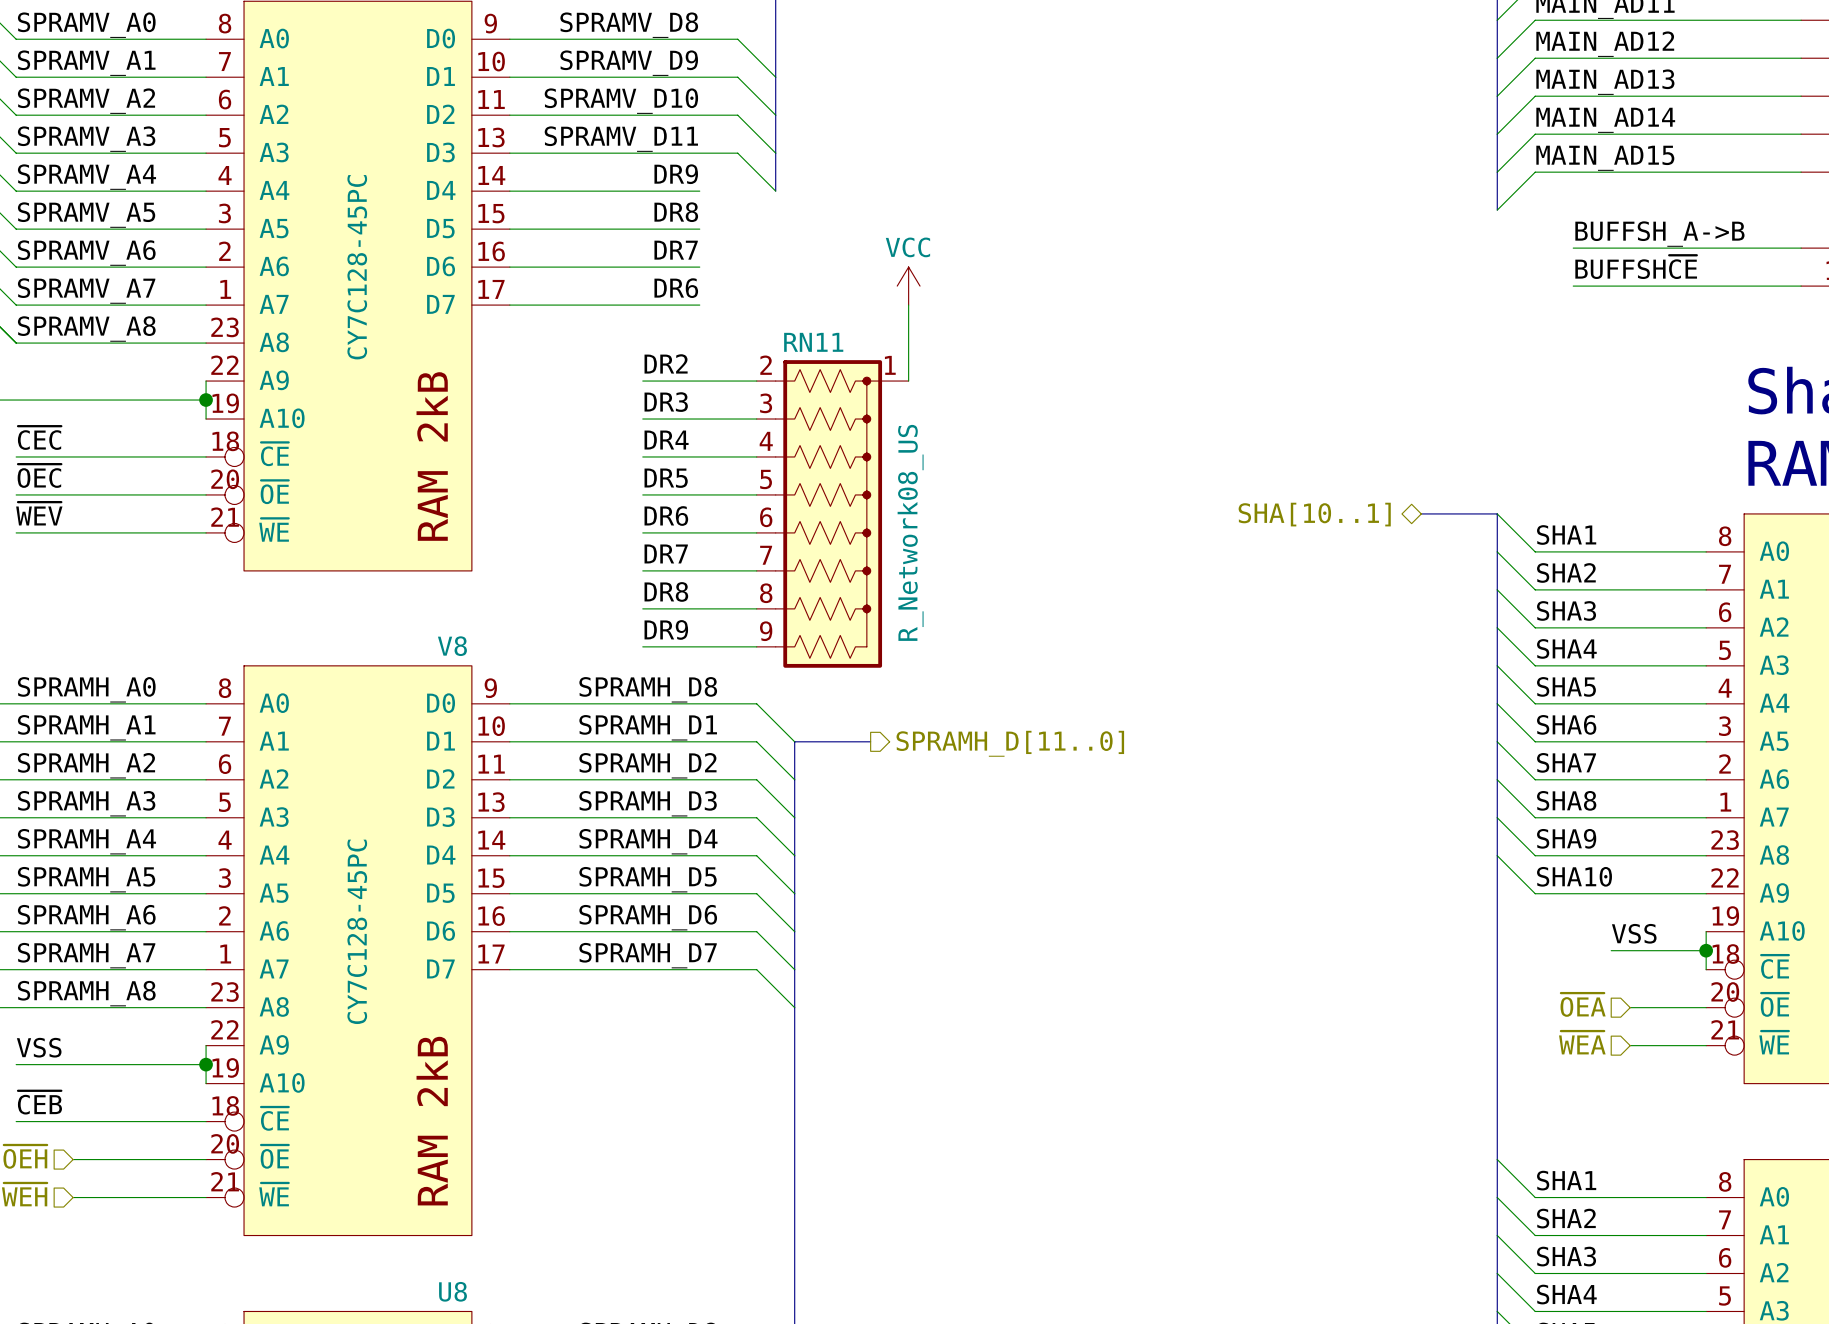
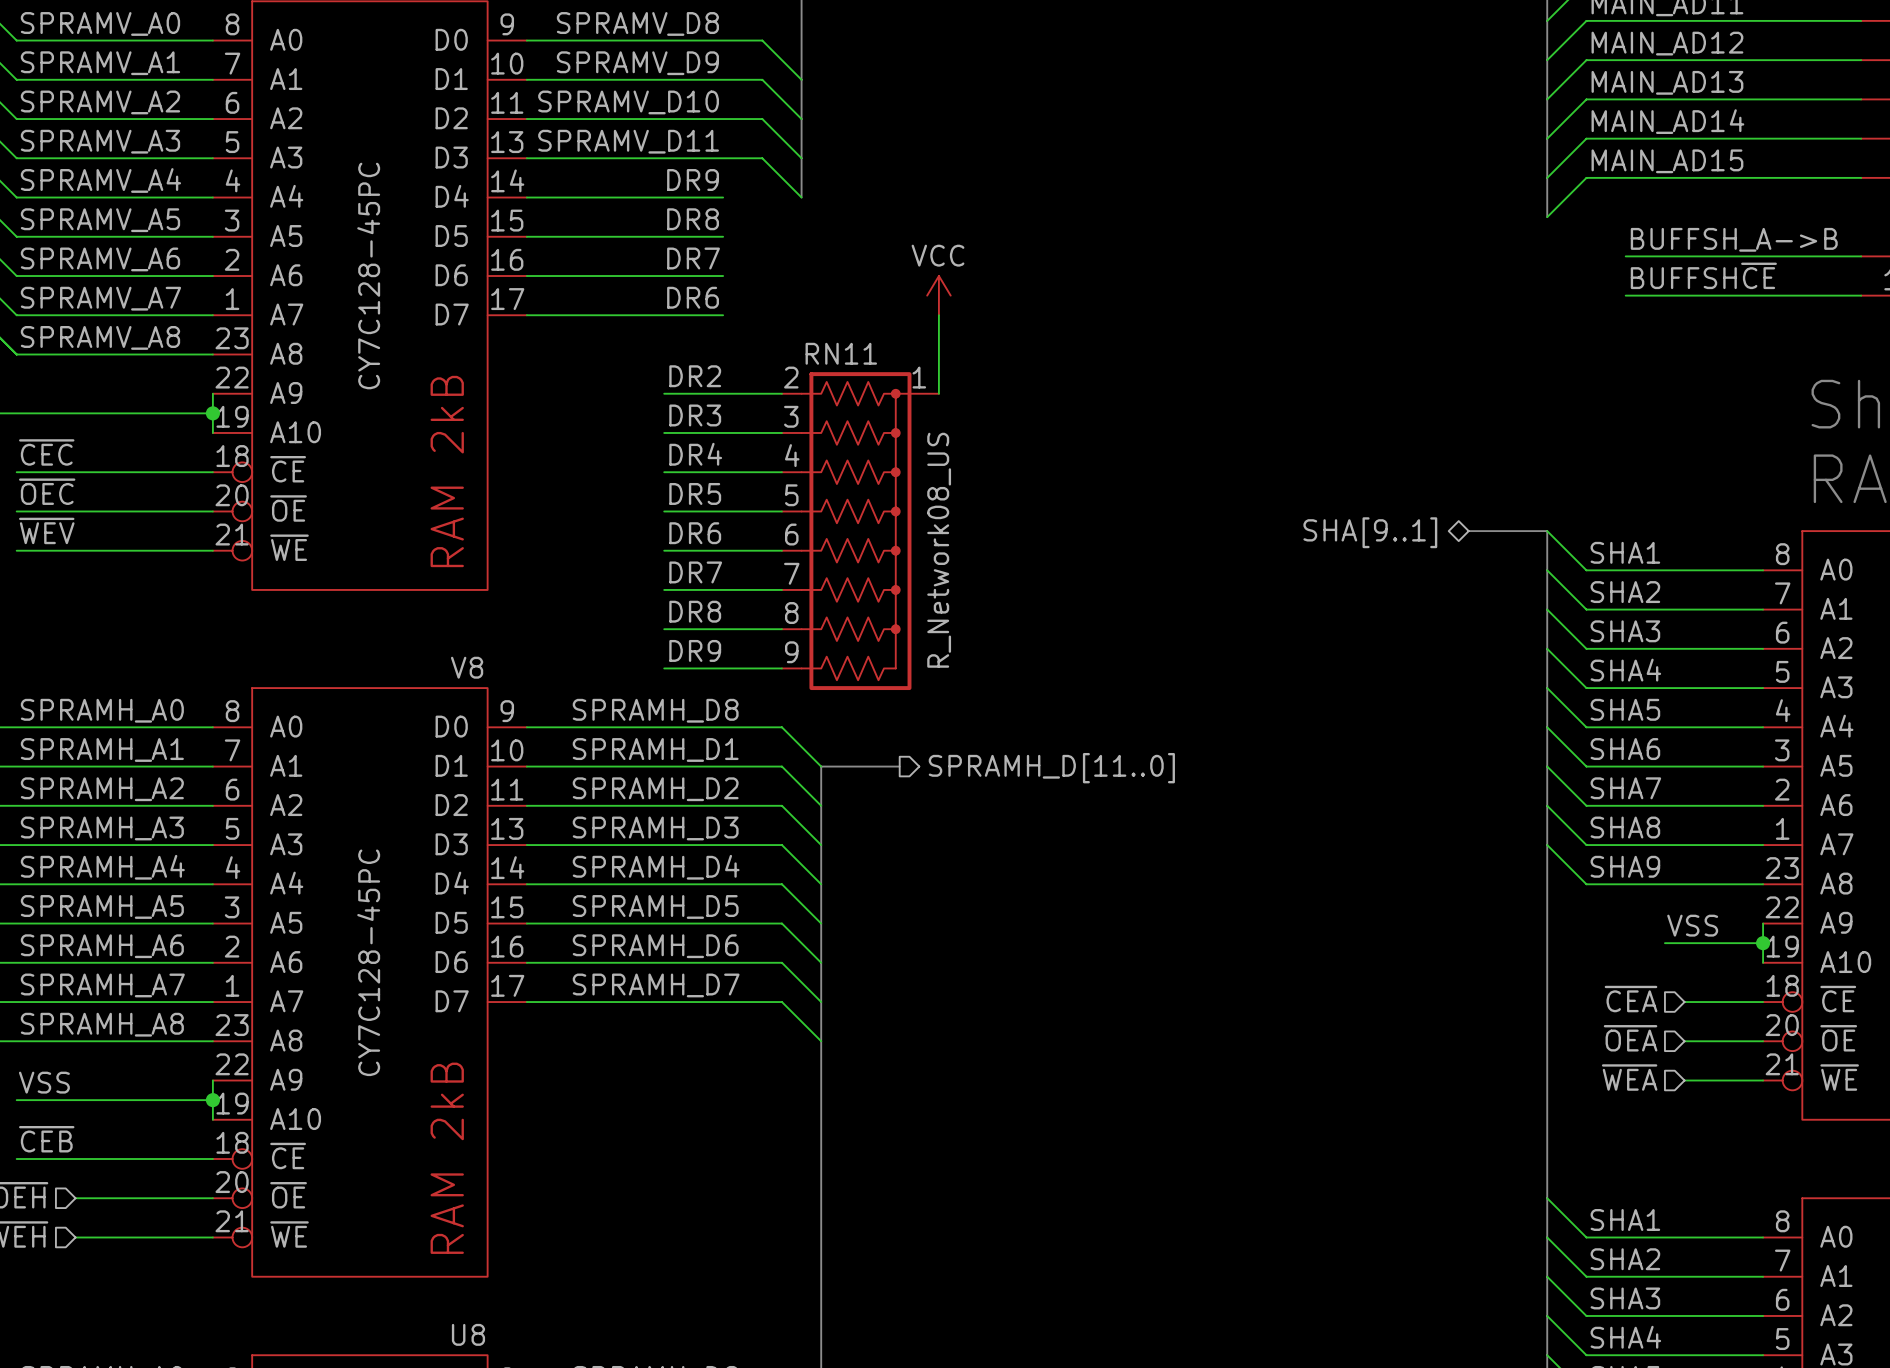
hierarchical label: SHA[10..1] (1314, 514) -> SHA[9..1] (1370, 532)
wire: (1497, 855) (1535, 893) (1706, 893) -> none
label: SHA10 (1574, 876) -> none
wire: (1706, 931) (1706, 969) -> (1763, 962) (1763, 923)
label position: VSS (1634, 933) -> VSS (1692, 925)
wire: (1611, 950) (1706, 950) -> (1664, 943) (1763, 943)
junction position: (1706, 950) -> (1763, 943)
hierarchical label: none -> ~{CEA} (1631, 999)
wire: none -> (1684, 1002) (1763, 1002)

